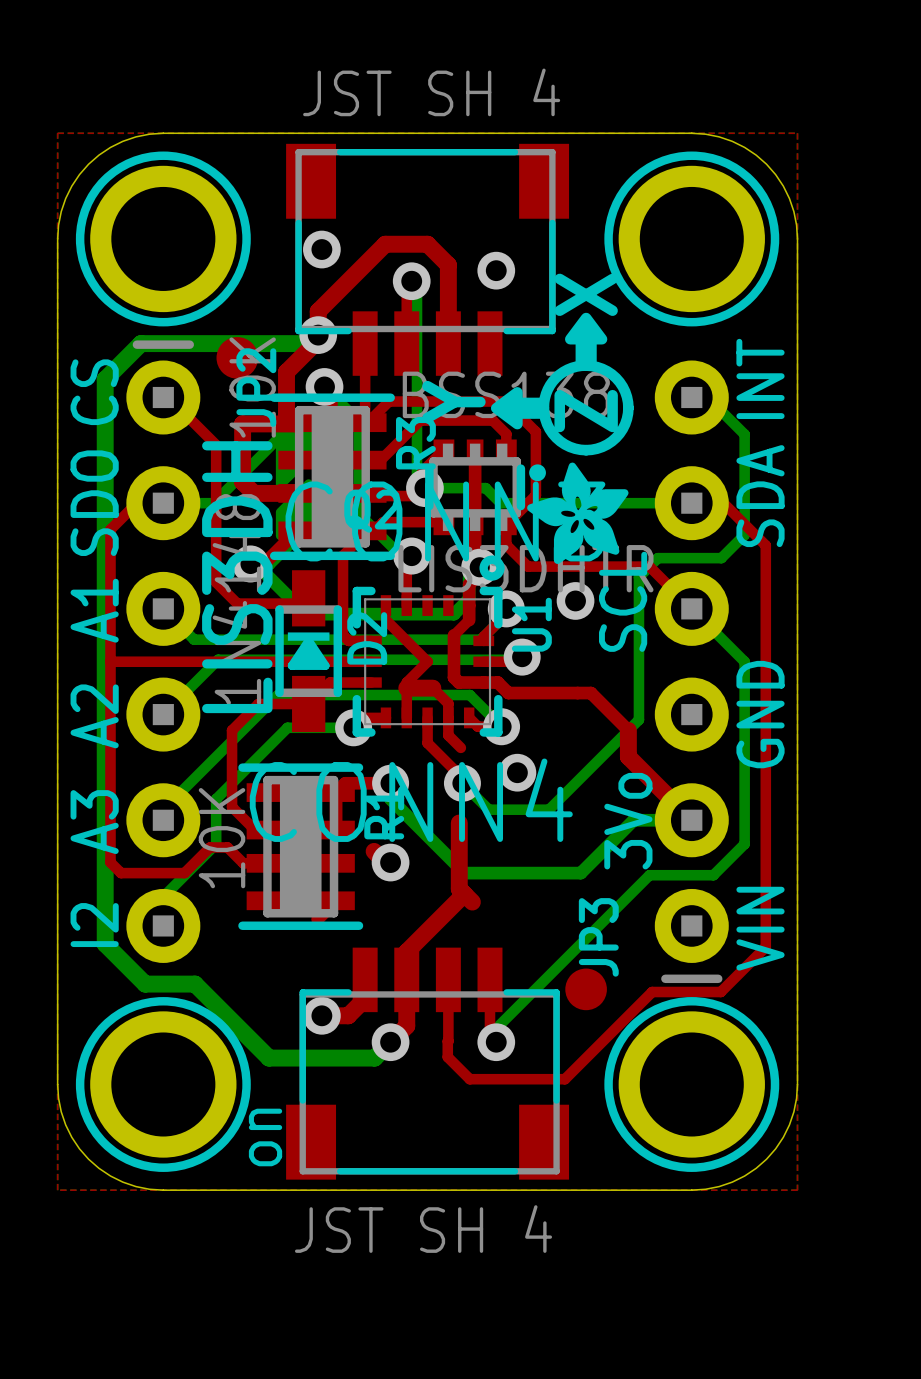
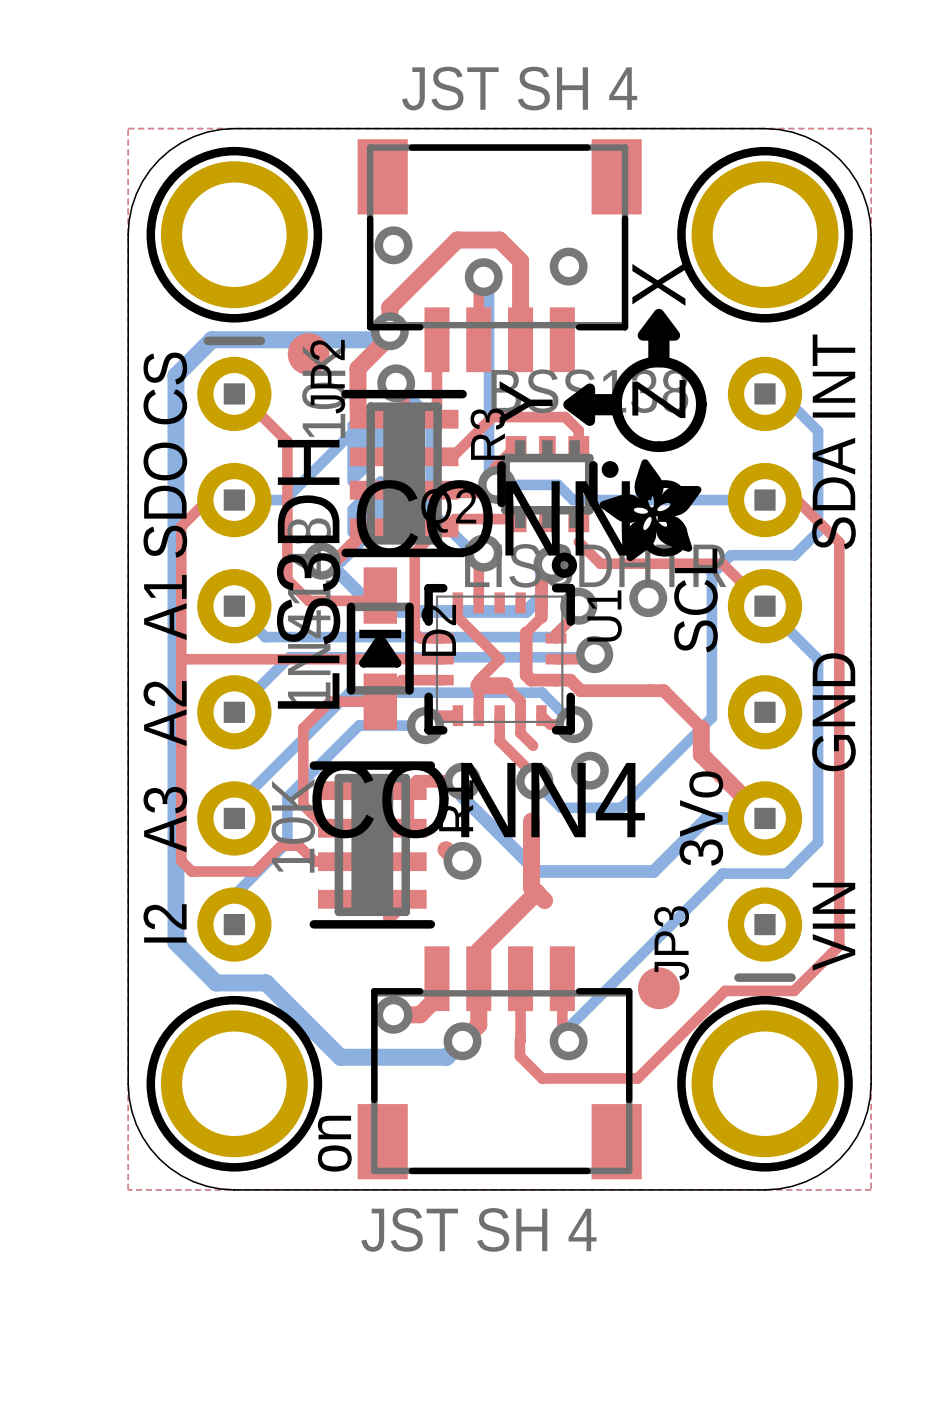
top track: (286, 412) (297, 422) (295, 423) (242, 423) (242, 482) (253, 493) (297, 493) -> none
top track: (365, 420) (367, 422) (388, 401) (505, 401) (535, 431) (535, 495) (506, 524) (506, 544) -> none
top track: (475, 449) (475, 562) -> none

